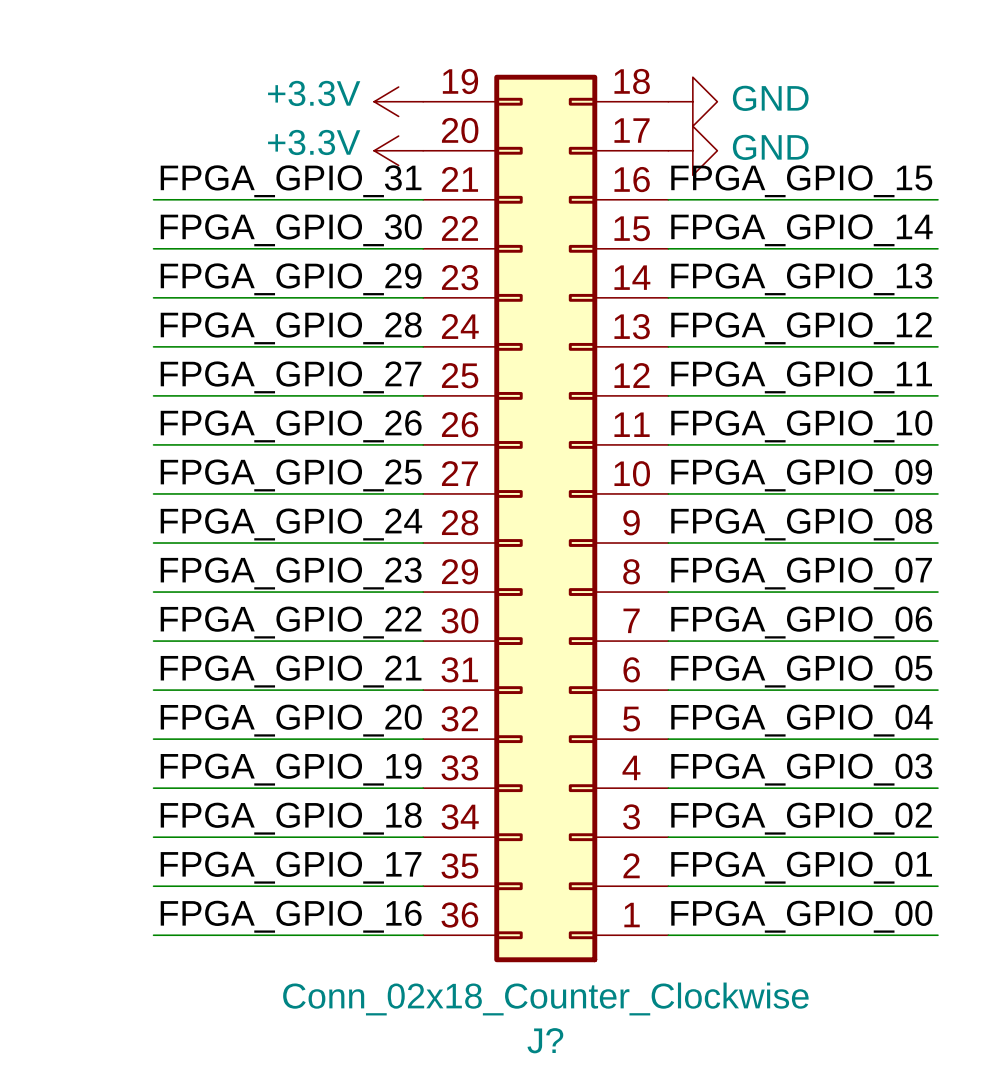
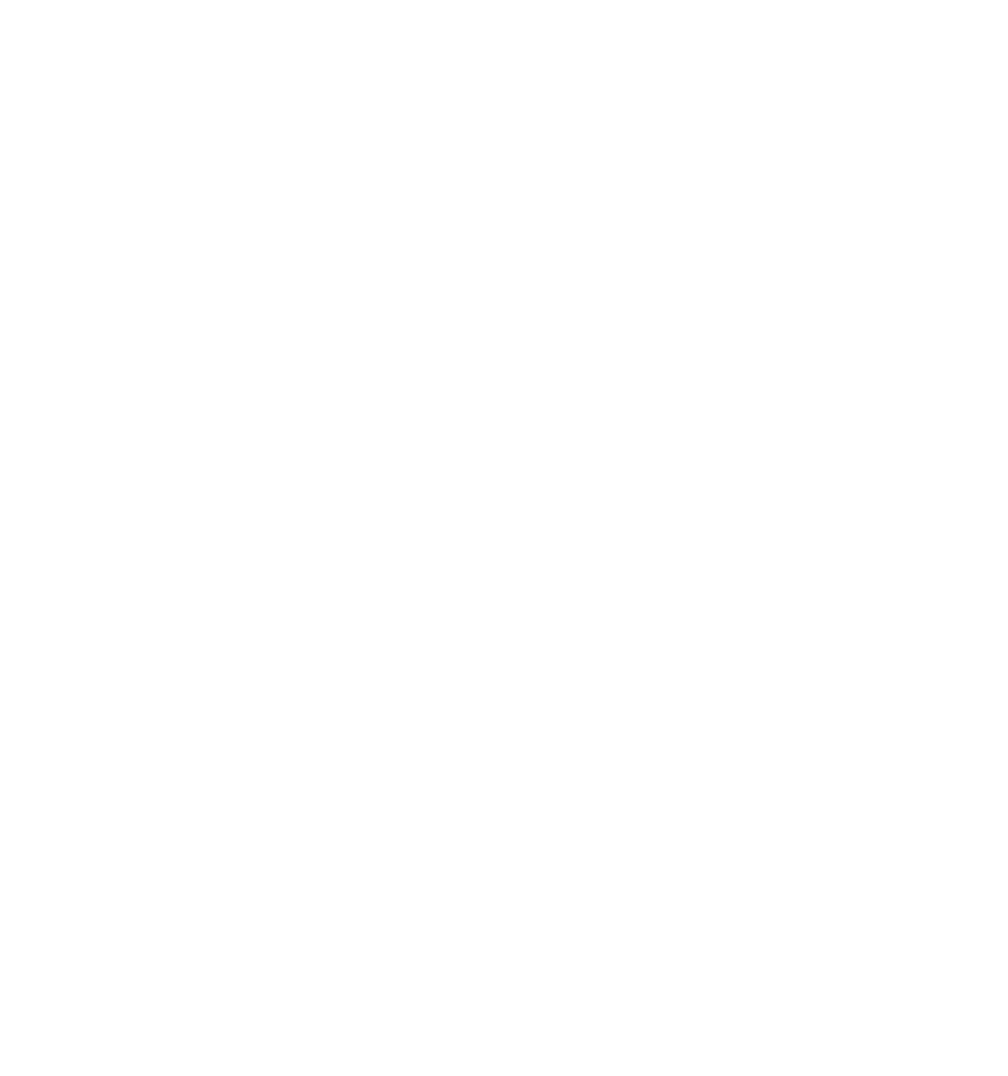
power symbol: +3.3V (398, 101) -> none
power symbol: GND (692, 101) -> none
power symbol: +3.3V (398, 150) -> none
power symbol: GND (692, 150) -> none
label: FPGA_GPIO_31 (291, 181) -> none
label: FPGA_GPIO_15 (801, 181) -> none
wire: (153, 199) (423, 199) -> none
wire: (668, 199) (938, 199) -> none
label: FPGA_GPIO_30 (291, 230) -> none
label: FPGA_GPIO_14 (801, 230) -> none
wire: (153, 248) (423, 248) -> none
wire: (668, 248) (938, 248) -> none
label: FPGA_GPIO_29 (291, 279) -> none
label: FPGA_GPIO_13 (801, 279) -> none
wire: (153, 297) (423, 297) -> none
wire: (668, 297) (938, 297) -> none
label: FPGA_GPIO_28 (291, 328) -> none
label: FPGA_GPIO_12 (801, 328) -> none
wire: (153, 346) (423, 346) -> none
wire: (668, 346) (938, 346) -> none
label: FPGA_GPIO_27 (291, 377) -> none
label: FPGA_GPIO_11 (801, 377) -> none
wire: (153, 395) (423, 395) -> none
wire: (668, 395) (938, 395) -> none
label: FPGA_GPIO_26 (291, 426) -> none
label: FPGA_GPIO_10 (801, 426) -> none
wire: (153, 444) (423, 444) -> none
wire: (668, 444) (938, 444) -> none
label: FPGA_GPIO_25 (291, 475) -> none
label: FPGA_GPIO_09 (801, 475) -> none
wire: (153, 493) (423, 493) -> none
wire: (668, 493) (938, 493) -> none
J?: Conn_02x18_Counter_Clockwise (545, 518) -> none
label: FPGA_GPIO_24 (291, 524) -> none
label: FPGA_GPIO_08 (801, 524) -> none
wire: (153, 543) (423, 543) -> none
wire: (668, 543) (938, 543) -> none
label: FPGA_GPIO_23 (291, 573) -> none
label: FPGA_GPIO_07 (801, 573) -> none
wire: (153, 592) (423, 592) -> none
wire: (668, 592) (938, 592) -> none
label: FPGA_GPIO_22 (291, 622) -> none
label: FPGA_GPIO_06 (801, 622) -> none
wire: (153, 641) (423, 641) -> none
wire: (668, 641) (938, 641) -> none
label: FPGA_GPIO_21 (291, 671) -> none
label: FPGA_GPIO_05 (801, 671) -> none
wire: (153, 690) (423, 690) -> none
wire: (668, 690) (938, 690) -> none
label: FPGA_GPIO_20 (291, 720) -> none
label: FPGA_GPIO_04 (801, 720) -> none
wire: (153, 739) (423, 739) -> none
wire: (668, 739) (938, 739) -> none
label: FPGA_GPIO_19 (291, 769) -> none
label: FPGA_GPIO_03 (801, 769) -> none
wire: (153, 788) (423, 788) -> none
wire: (668, 788) (938, 788) -> none
label: FPGA_GPIO_18 (291, 818) -> none
label: FPGA_GPIO_02 (801, 818) -> none
wire: (153, 837) (423, 837) -> none
wire: (668, 837) (938, 837) -> none
label: FPGA_GPIO_17 (291, 867) -> none
label: FPGA_GPIO_01 (801, 867) -> none
wire: (153, 886) (423, 886) -> none
wire: (668, 886) (938, 886) -> none
label: FPGA_GPIO_16 (291, 916) -> none
label: FPGA_GPIO_00 (801, 916) -> none
wire: (153, 935) (423, 935) -> none
wire: (668, 935) (938, 935) -> none

